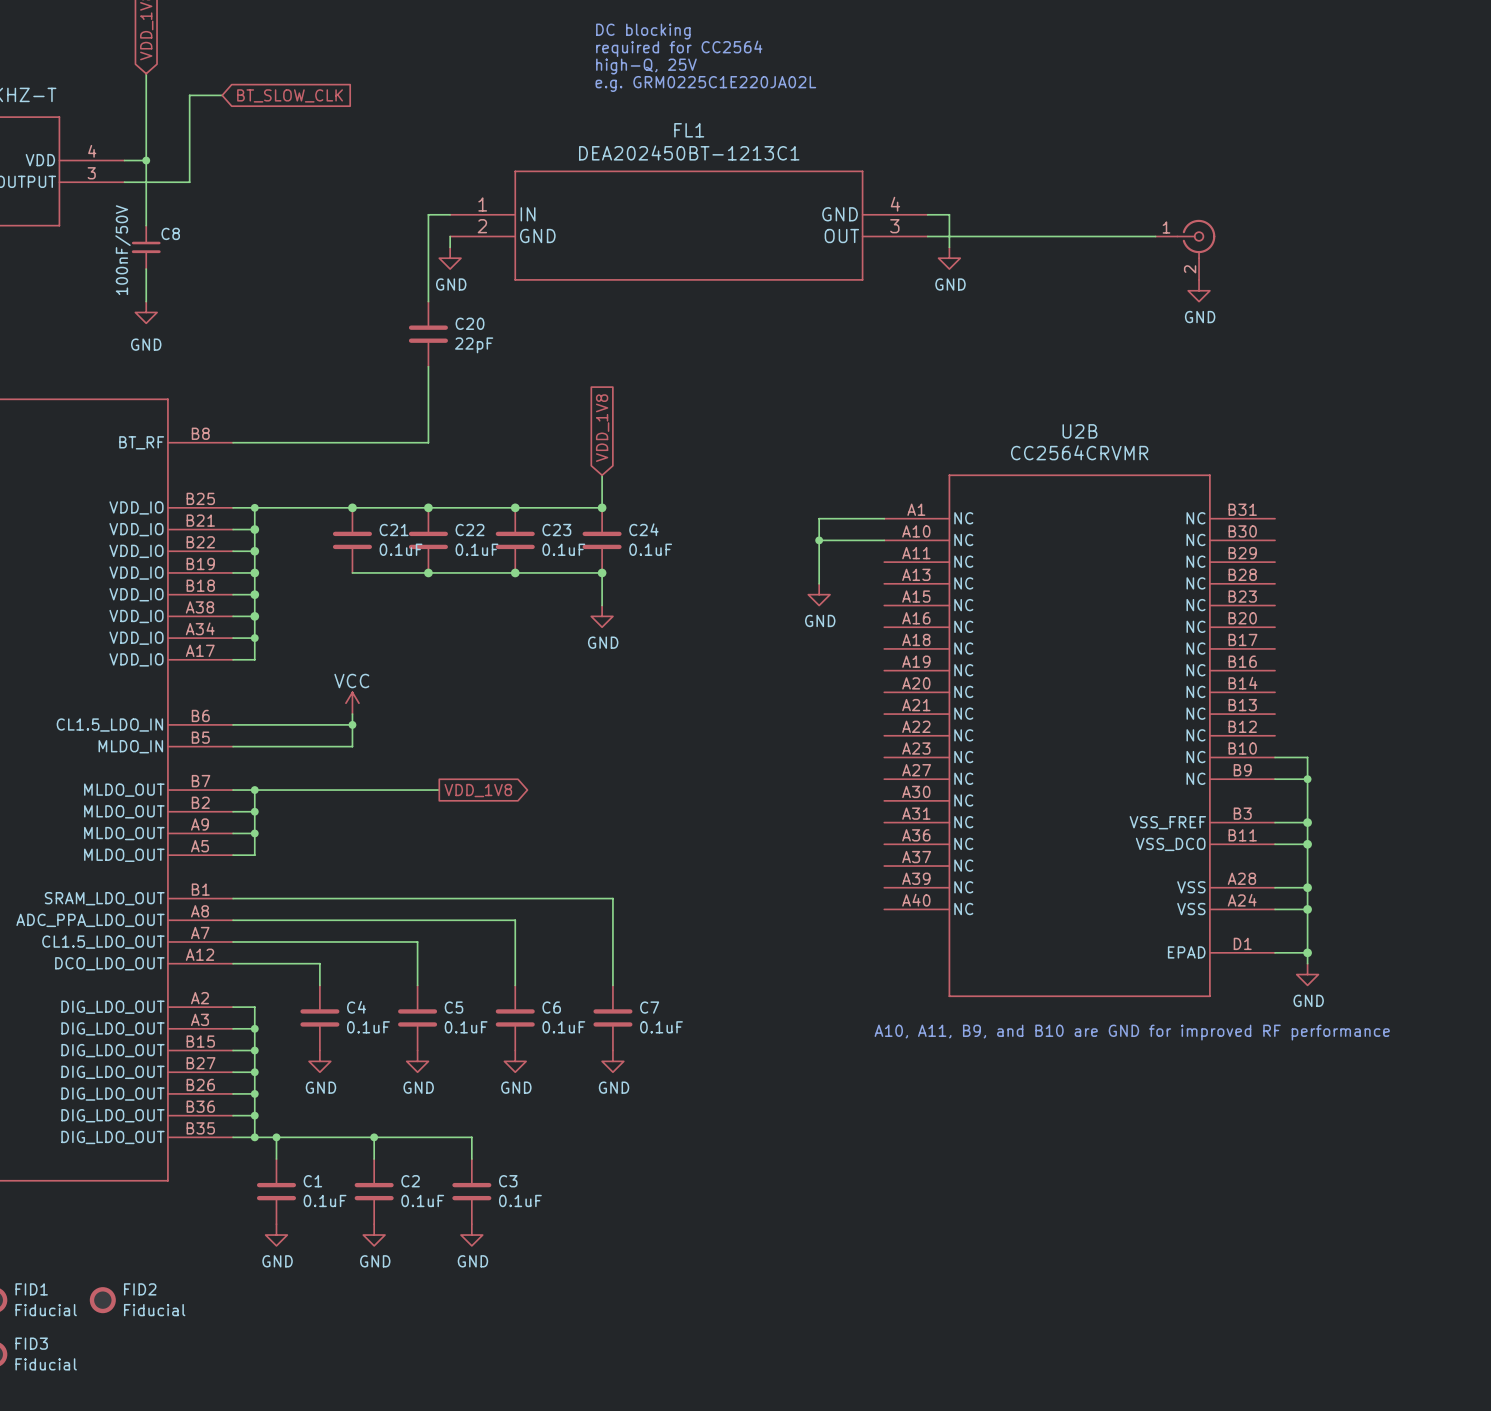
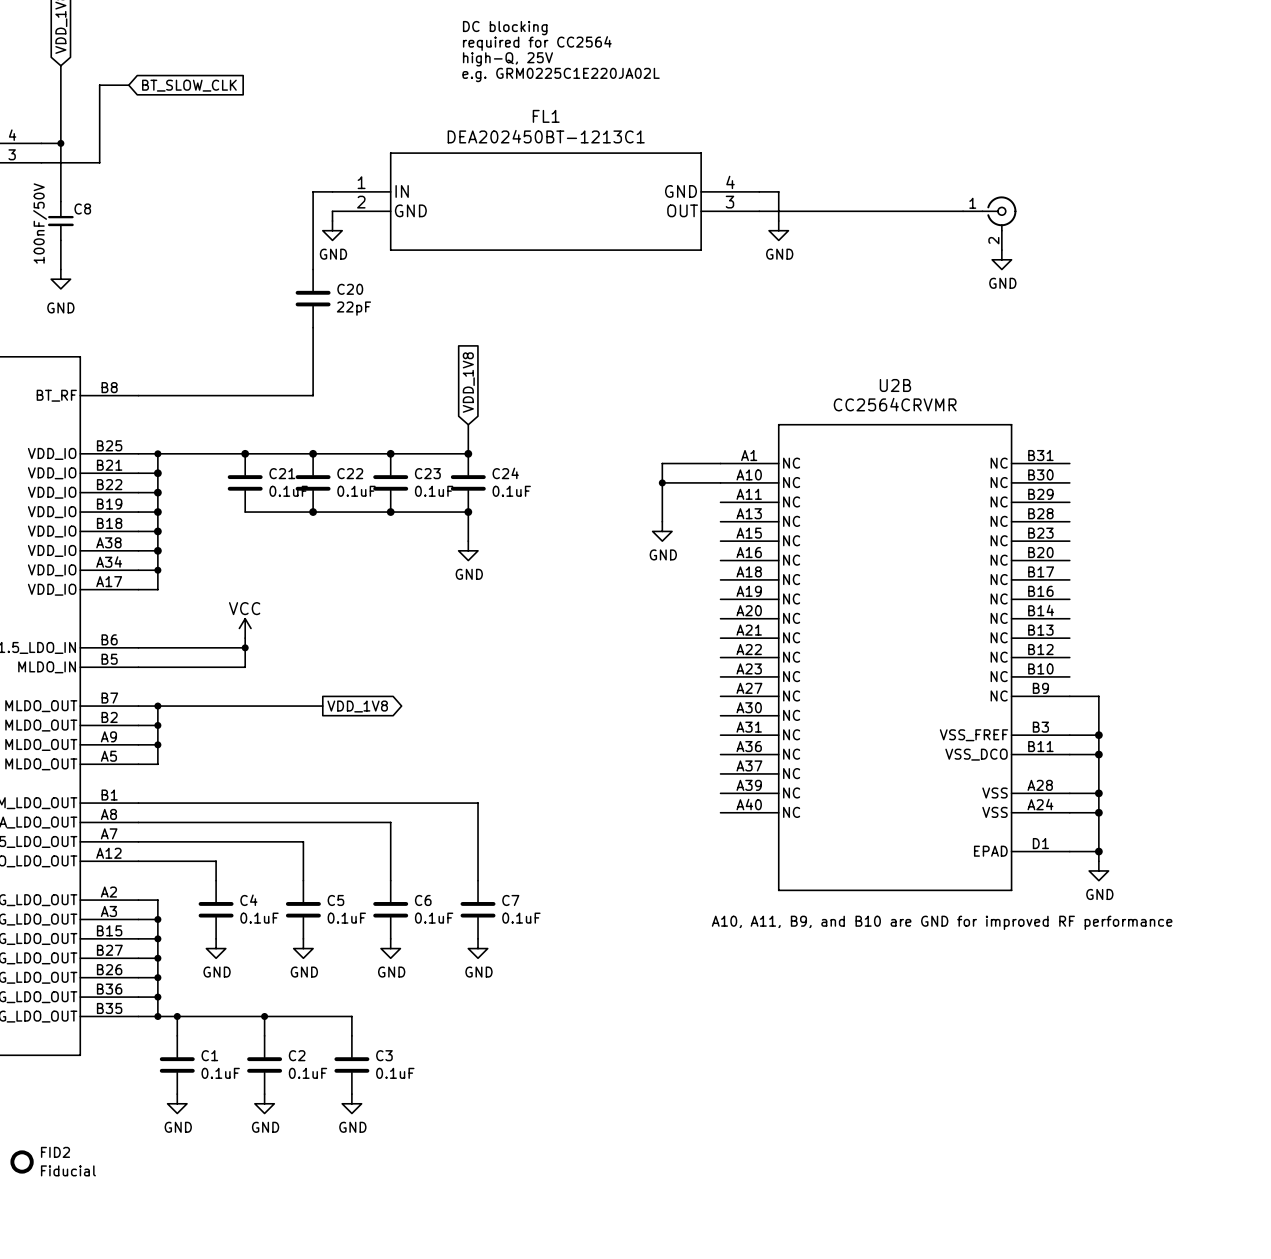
wire: (1275, 757) (1307, 757) (1307, 779) -> none
junction: (1307, 779) -> none

